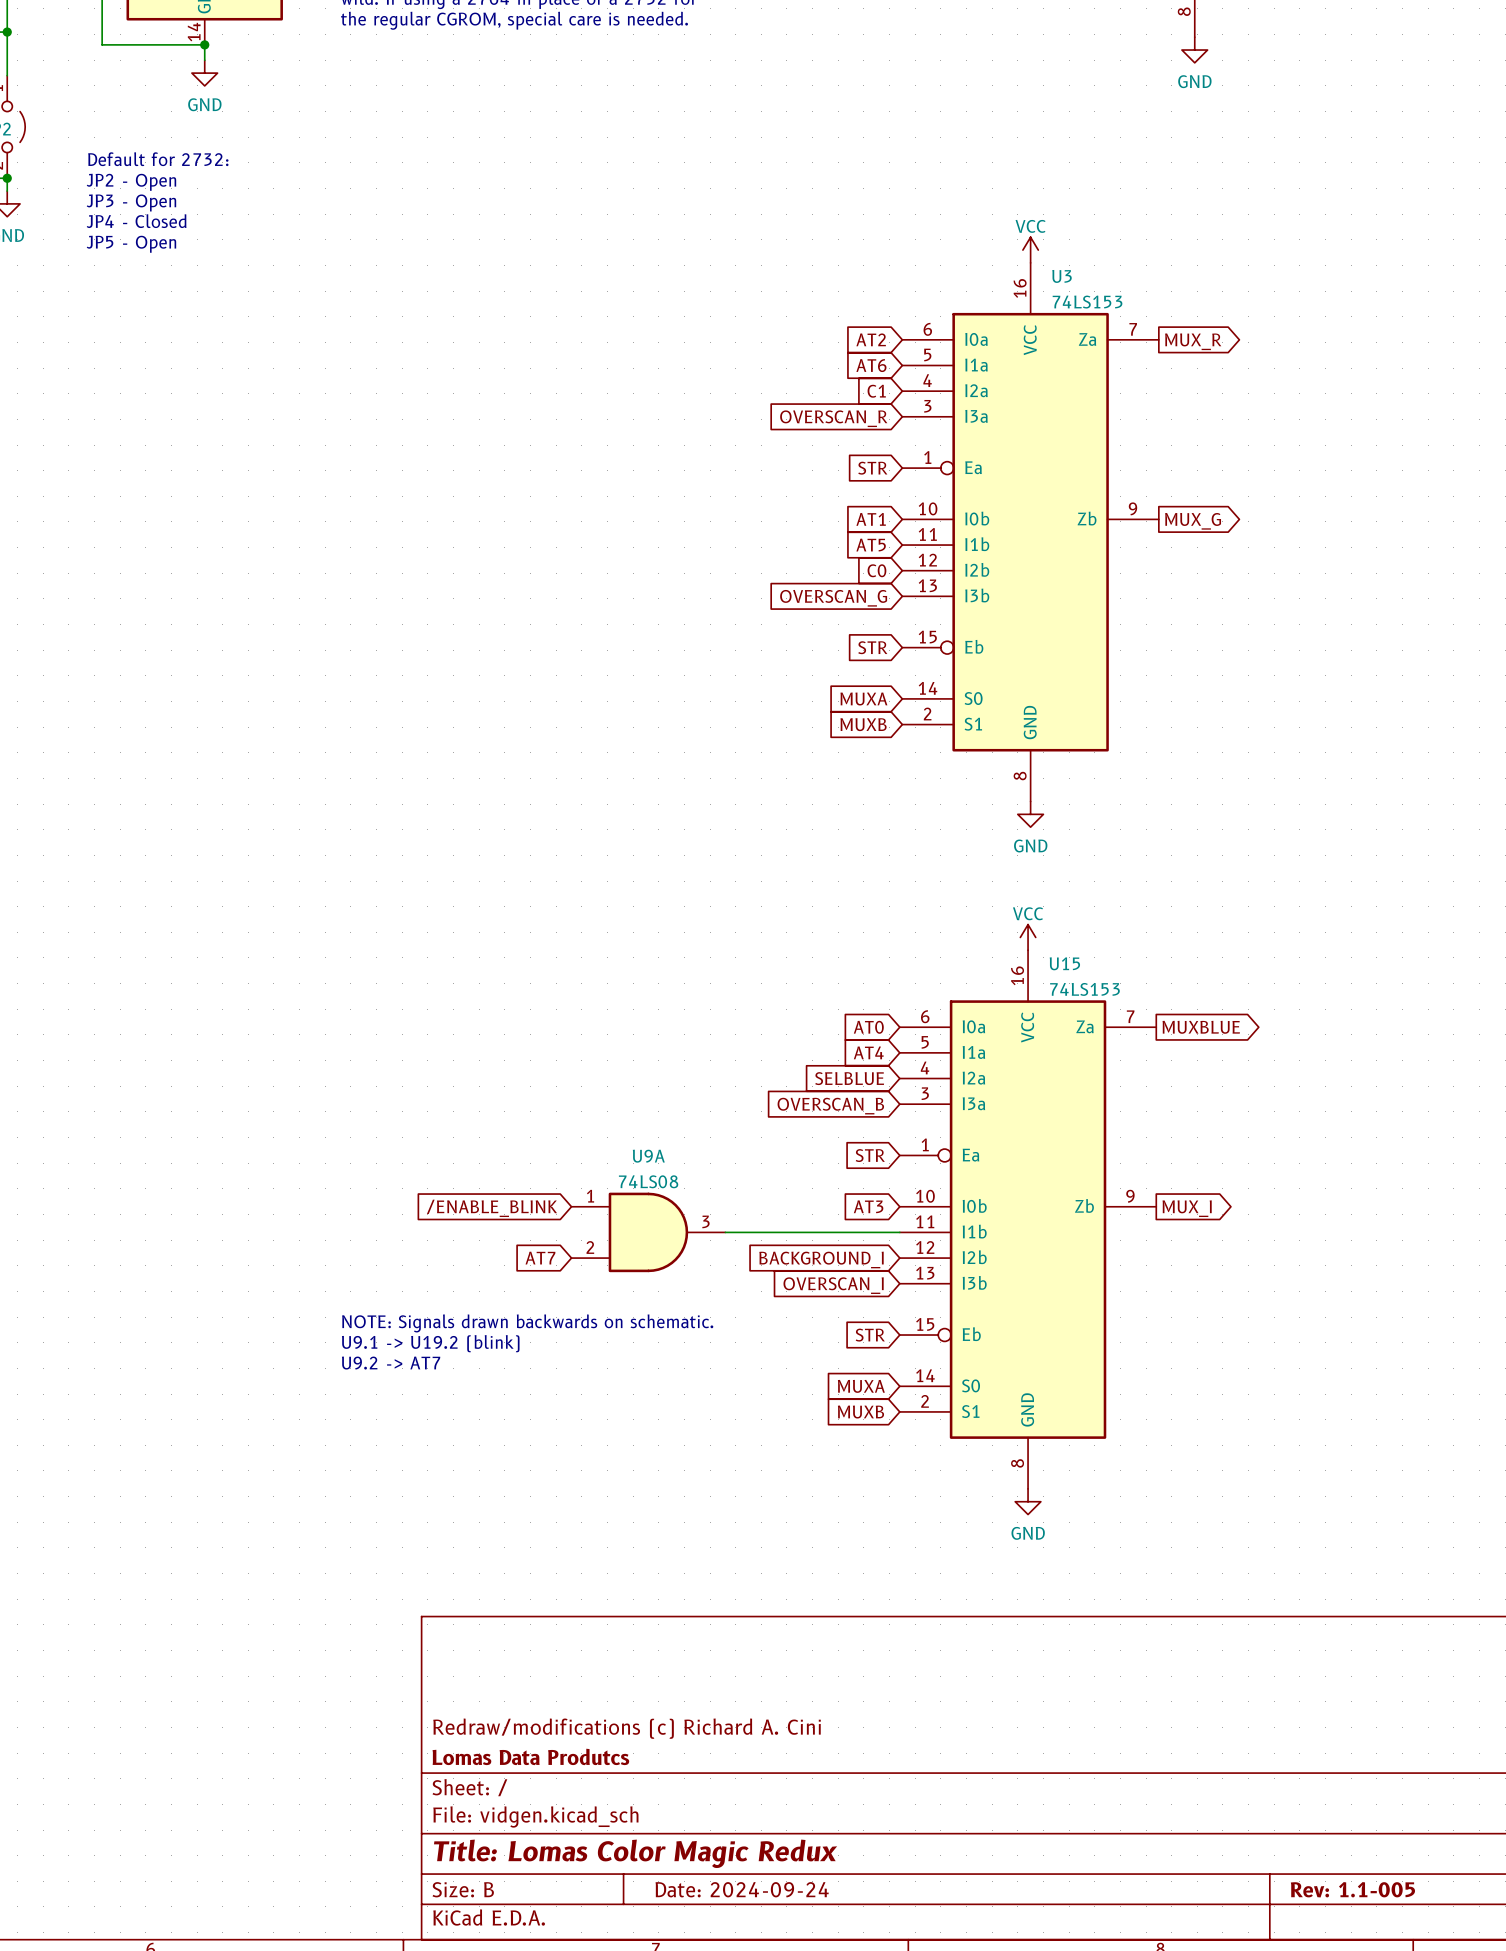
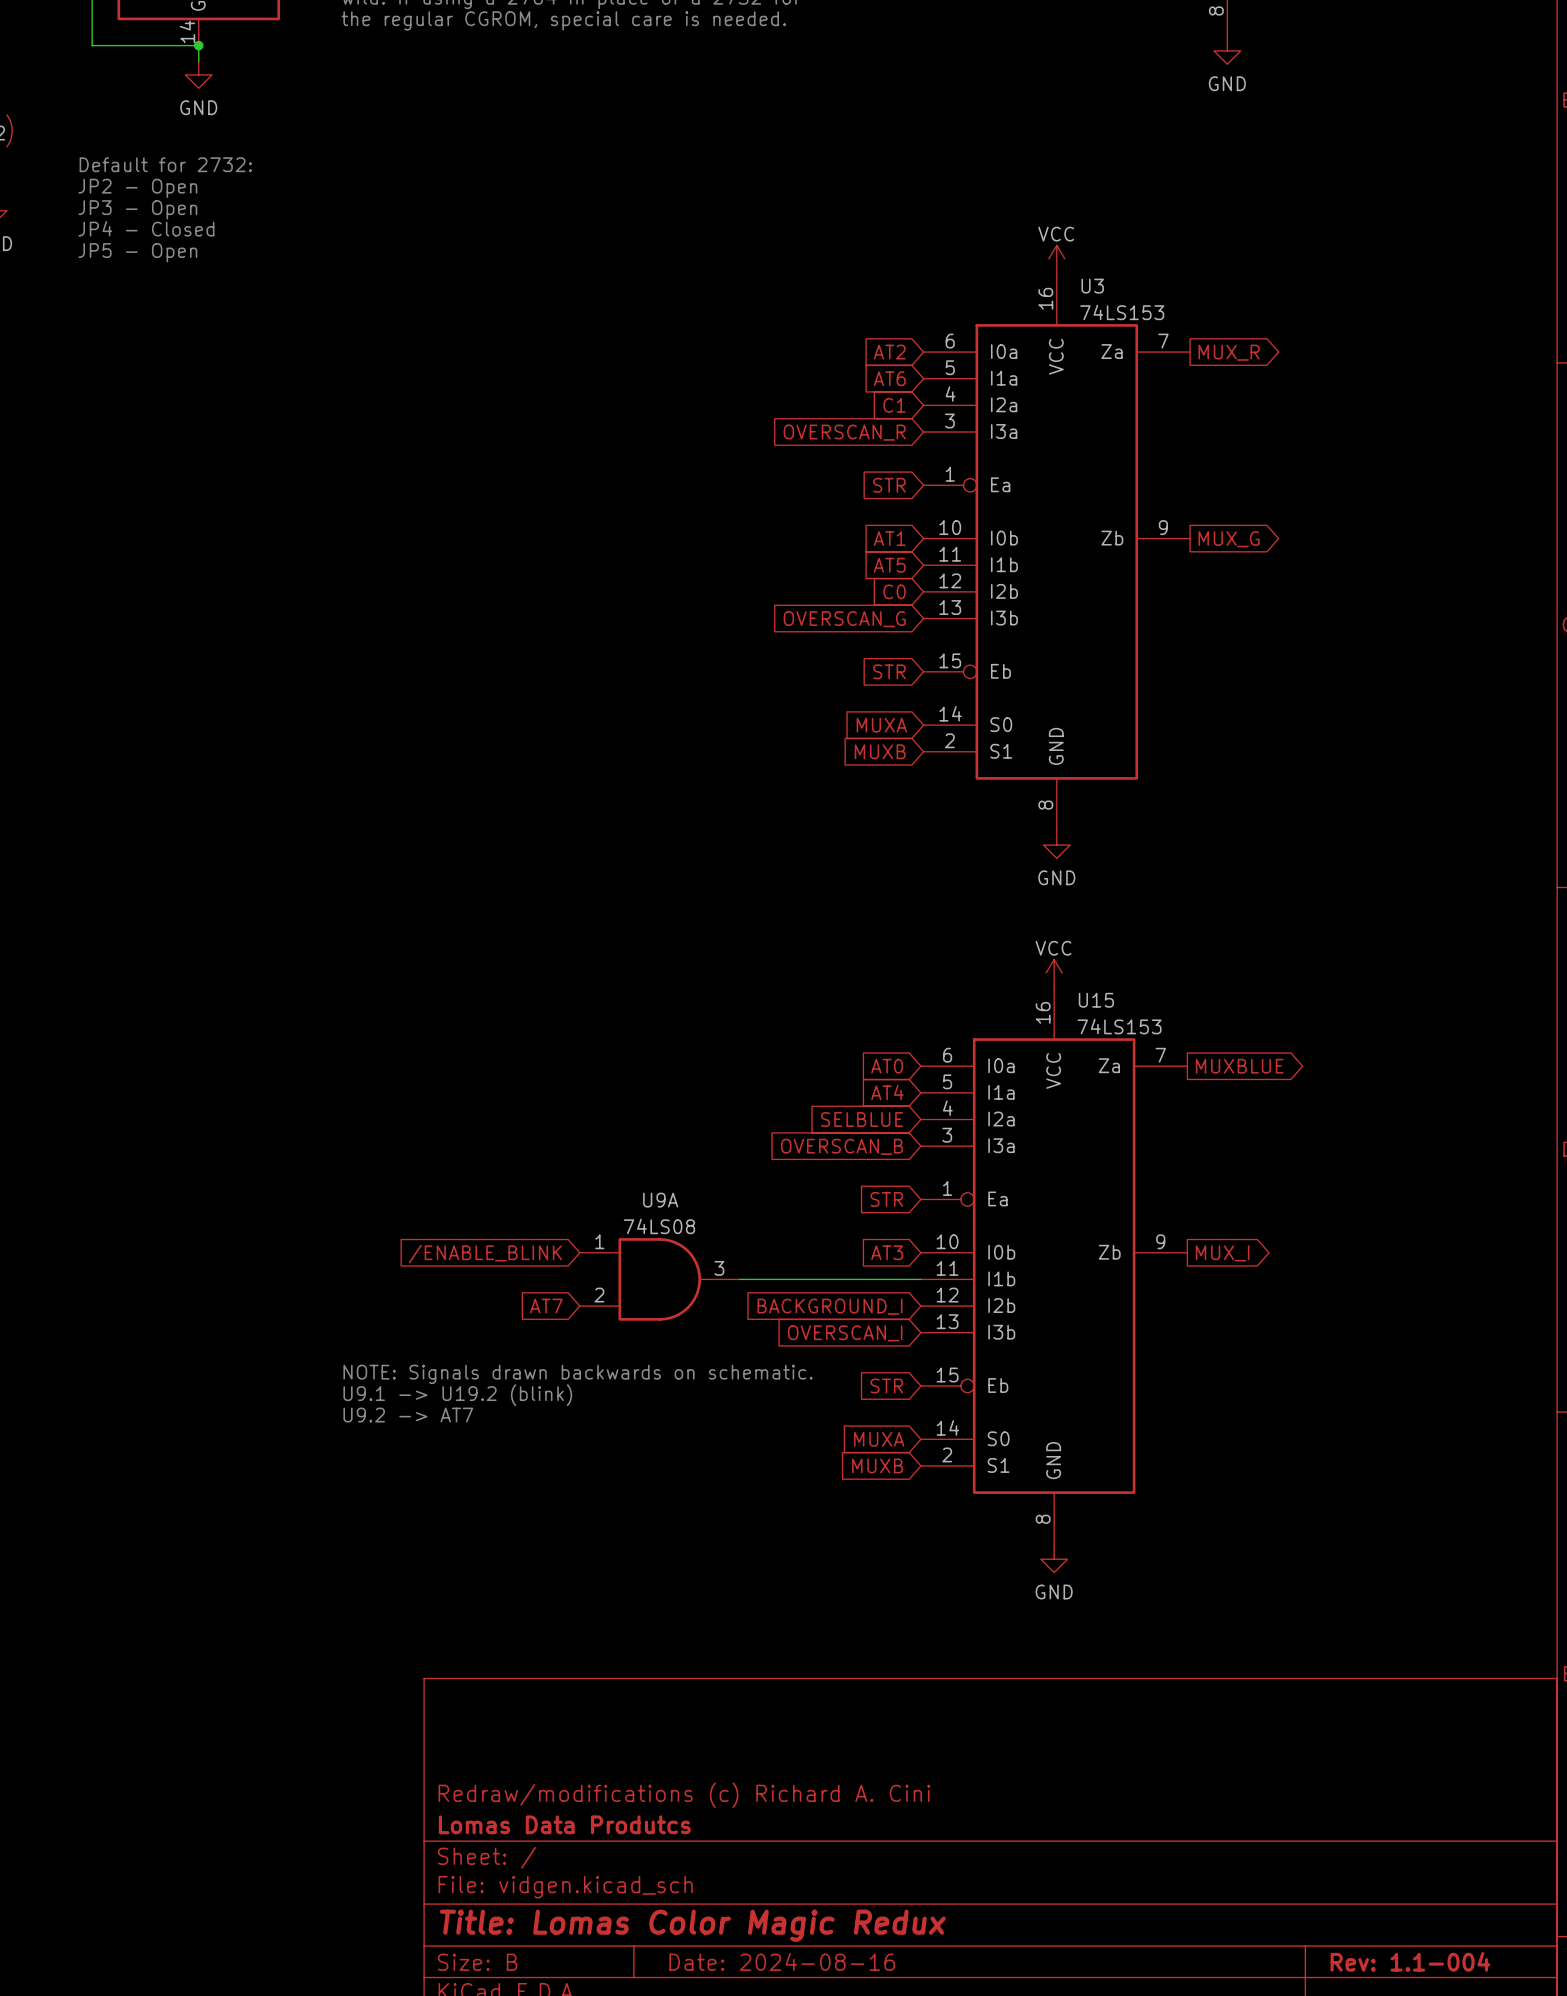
title block: Date: 2024-09-24 (742, 1889) -> Date: 2024-08-16 (782, 1961)
title block: Rev: 1.1-005 (1352, 1889) -> Rev: 1.1-004 (1410, 1961)

